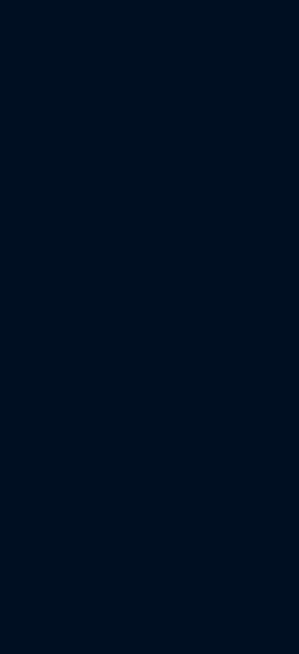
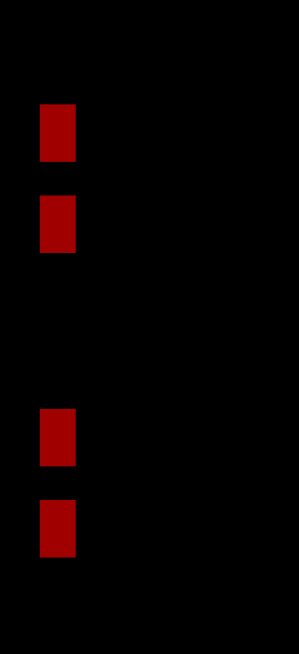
part: none -> (57, 178)
part: none -> (57, 483)

